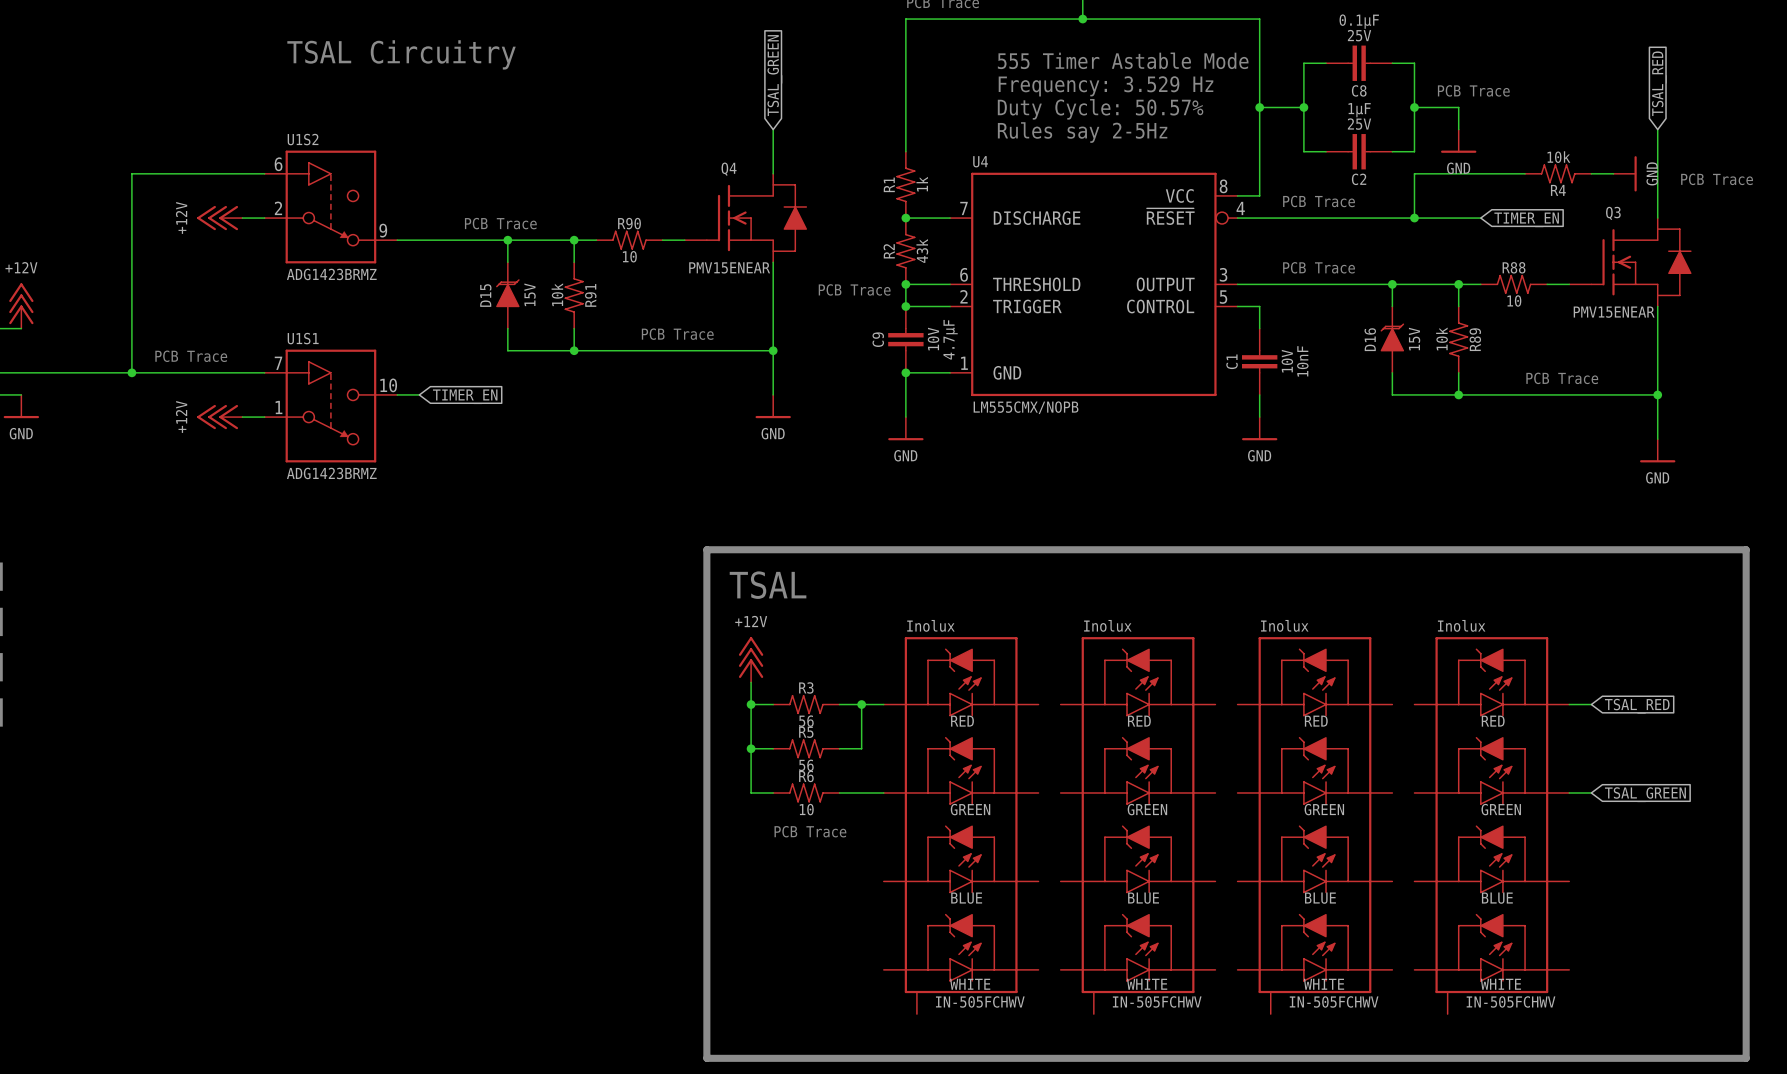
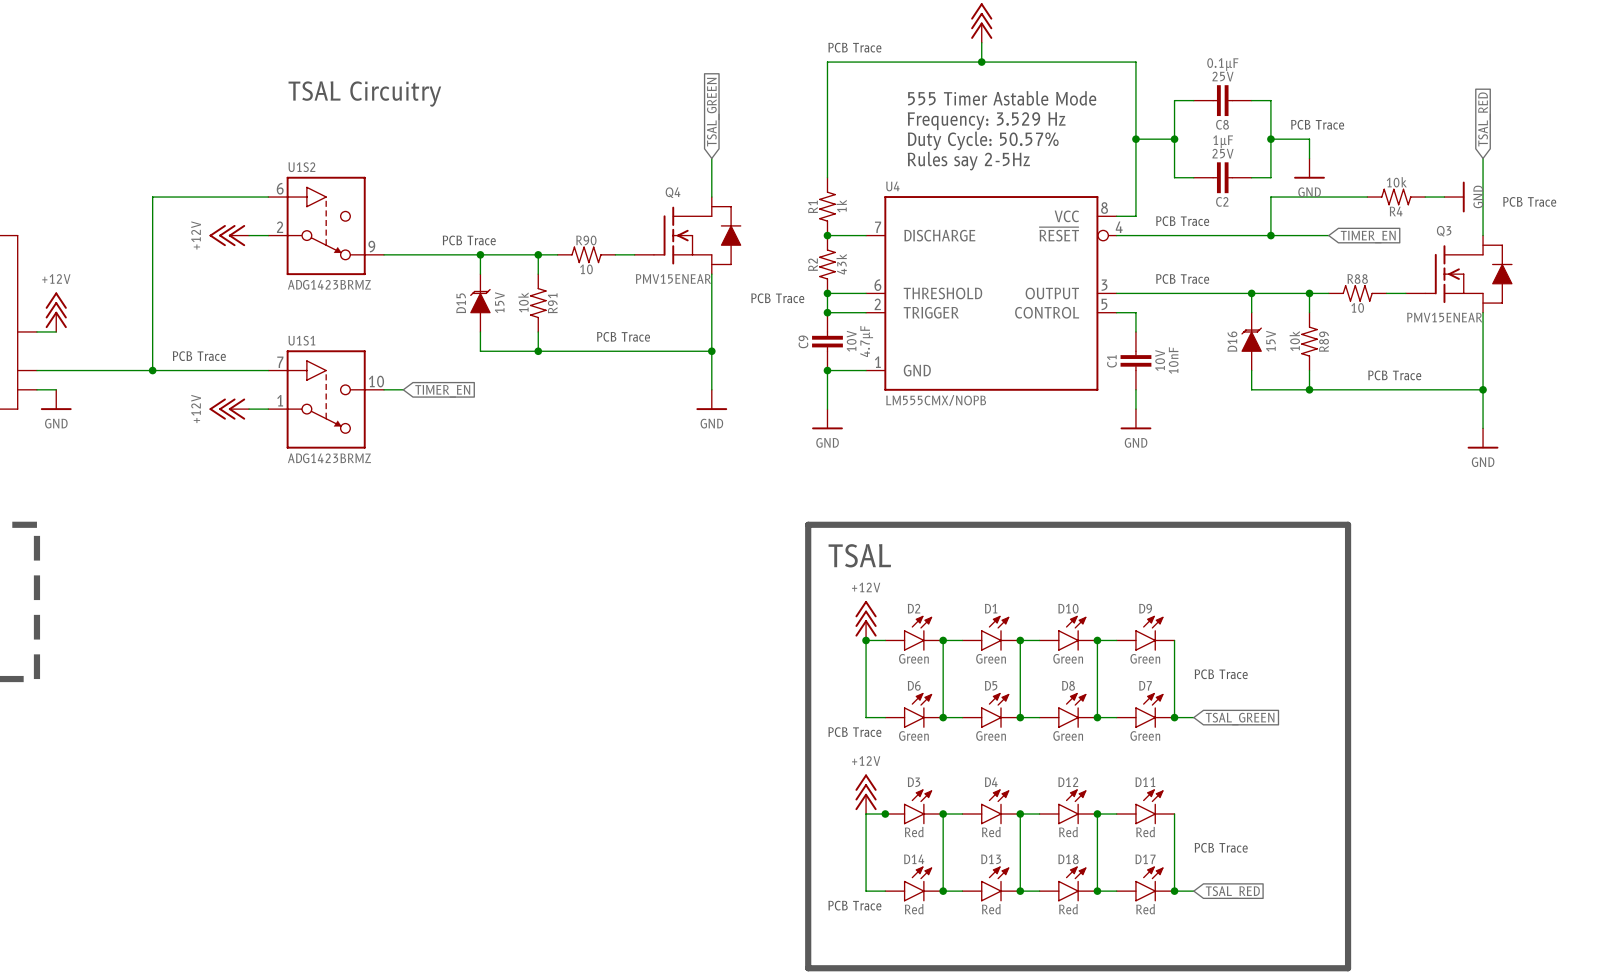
line: (883, 549) (706, 549) (706, 1058) (883, 1058) -> (808, 524) (808, 968)
line: (1502, 549) (1746, 549) (1746, 1058) (1502, 1058) -> (1348, 524) (1348, 968)
text position: TSAL (768, 585) -> TSAL (859, 555)
power symbol: +12V (751, 659) -> none
power symbol: none -> +12V (866, 620)
D2: none -> (914, 633)
D1: none -> (991, 633)
D10: none -> (1068, 633)
D9: none -> (1145, 633)
wire: (751, 682) (751, 792) (773, 792) -> none
junction: none -> (866, 640)
wire: none -> (885, 640) (866, 640) (866, 717) (885, 717)
junction: none -> (943, 640)
wire: none -> (962, 640) (943, 640) (943, 717) (962, 717)
junction: none -> (1020, 640)
wire: none -> (1039, 640) (1020, 640) (1020, 717) (1039, 717)
junction: none -> (1097, 640)
wire: none -> (1116, 640) (1097, 640) (1097, 717) (1116, 717)
wire: none -> (1174, 640) (1174, 717) (1193, 717)
wire: (751, 704) (773, 704) -> none
junction: (751, 704) -> none
R3: 56 (806, 704) -> none
wire: (839, 704) (883, 704) -> none
wire: (861, 704) (861, 748) (839, 748) -> none
junction: (861, 704) -> none
wire: (1569, 704) (1591, 704) -> none
global label: TSAL_RED (1637, 706) -> none
text: none -> PCB Trace (1221, 674)
wire: (751, 748) (773, 748) -> none
junction: (751, 748) -> none
R5: 56 (806, 748) -> none
D6: none -> (914, 710)
D5: none -> (991, 710)
D8: none -> (1068, 710)
D7: none -> (1145, 710)
junction: none -> (943, 717)
junction: none -> (1020, 717)
junction: none -> (1097, 717)
junction: none -> (1174, 717)
global label: none -> TSAL_GREEN (1240, 719)
text: none -> PCB Trace (854, 732)
R6: 10 (806, 792) -> none
wire: (839, 792) (883, 792) -> none
wire: (1569, 792) (1591, 792) -> none
global label: TSAL_GREEN (1645, 794) -> none
part: (961, 825) -> none
part: (1138, 825) -> none
part: (1314, 825) -> none
part: (1491, 825) -> none
text: PCB Trace (810, 831) -> none
power symbol: none -> +12V (866, 794)
D3: none -> (914, 806)
D4: none -> (991, 806)
D12: none -> (1068, 806)
D11: none -> (1145, 806)
wire: none -> (885, 814) (866, 814) (866, 891) (885, 891)
junction: none -> (885, 814)
junction: none -> (943, 814)
wire: none -> (962, 814) (943, 814) (943, 891) (962, 891)
junction: none -> (1020, 814)
wire: none -> (1039, 814) (1020, 814) (1020, 891) (1039, 891)
junction: none -> (1097, 814)
wire: none -> (1116, 814) (1097, 814) (1097, 891) (1116, 891)
wire: none -> (1174, 814) (1174, 891) (1193, 891)
text: none -> PCB Trace (1221, 847)
D14: none -> (914, 883)
D13: none -> (991, 883)
D18: none -> (1068, 883)
D17: none -> (1145, 883)
junction: none -> (943, 891)
junction: none -> (1020, 891)
junction: none -> (1097, 891)
junction: none -> (1174, 891)
global label: none -> TSAL_RED (1232, 892)
text: none -> PCB Trace (854, 905)

